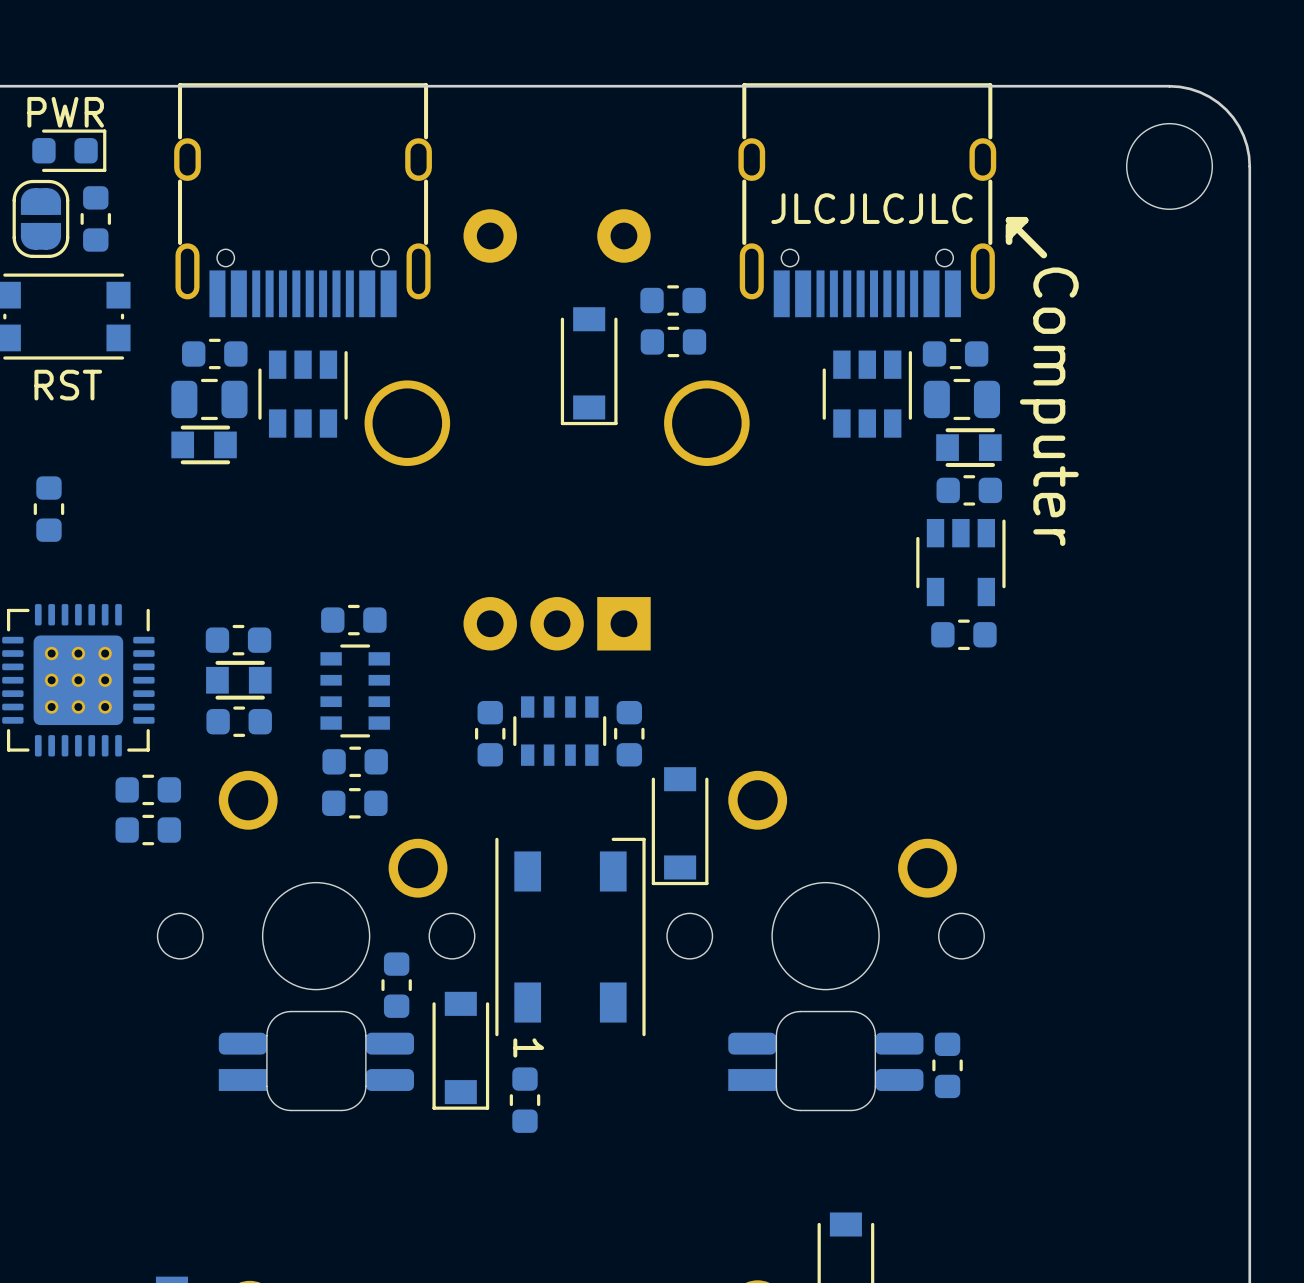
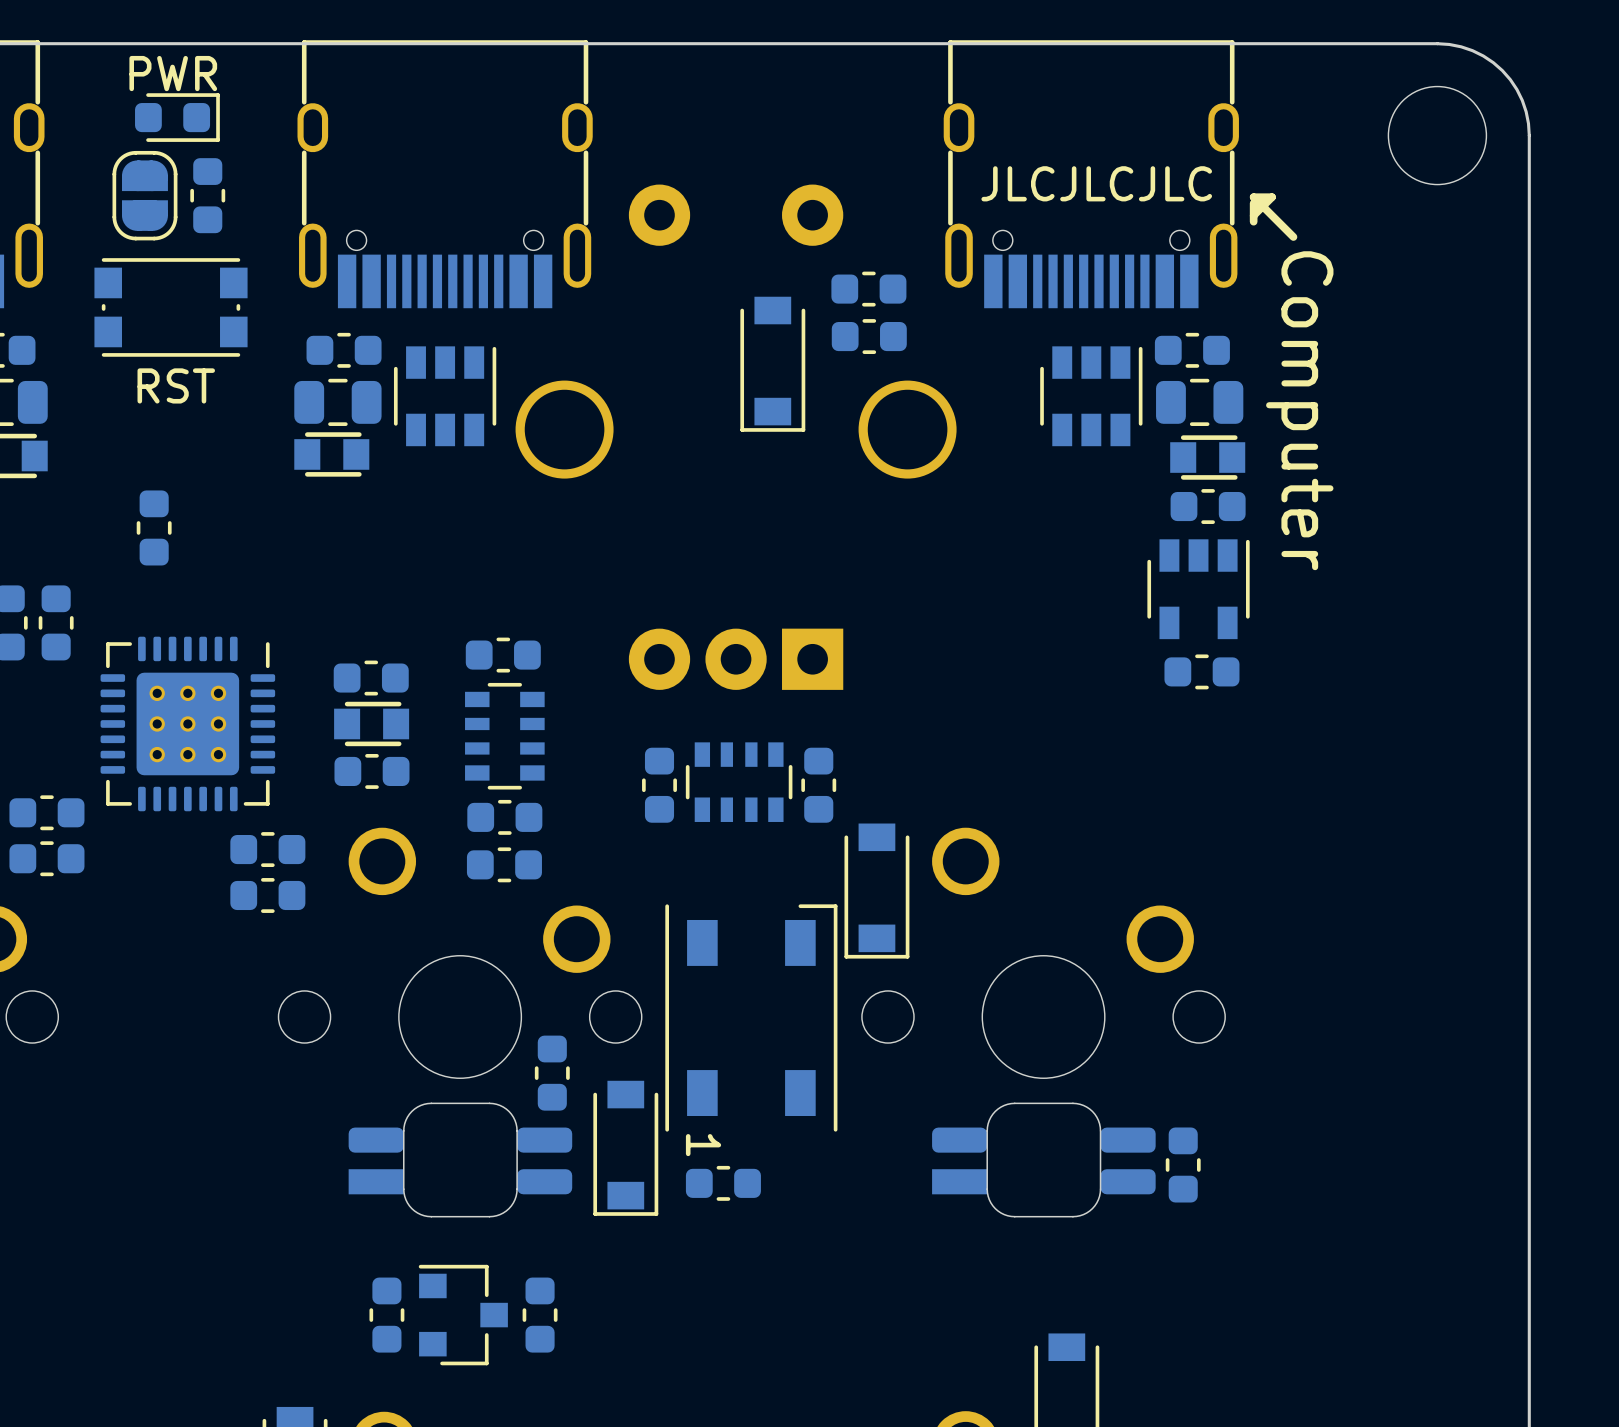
part rotation: 0° (525, 1100) -> 90° clockwise (723, 1183)
part: none -> (386, 1315)
part: none -> (463, 1315)
part: none -> (540, 1315)

